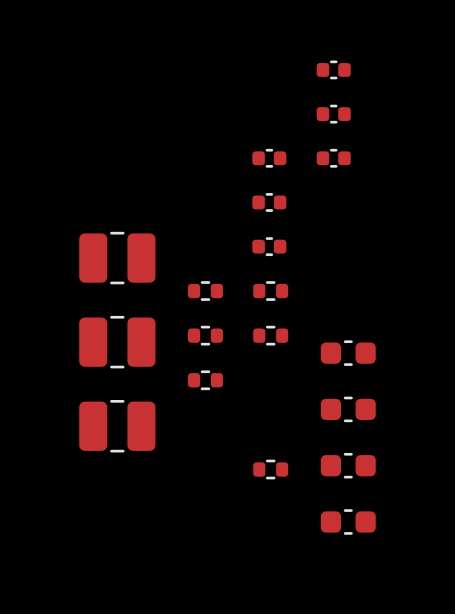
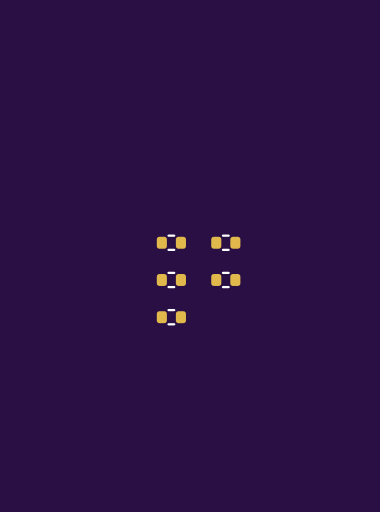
part: (333, 69) -> none
part: (333, 114) -> none
part: (269, 158) -> none
part: (333, 158) -> none
part: (269, 202) -> none
part: (269, 246) -> none
part: (117, 258) -> none
part: (117, 342) -> none
part: (348, 353) -> none
part: (348, 409) -> none
part: (117, 426) -> none
part: (348, 465) -> none
part: (270, 469) -> none
part: (348, 521) -> none

